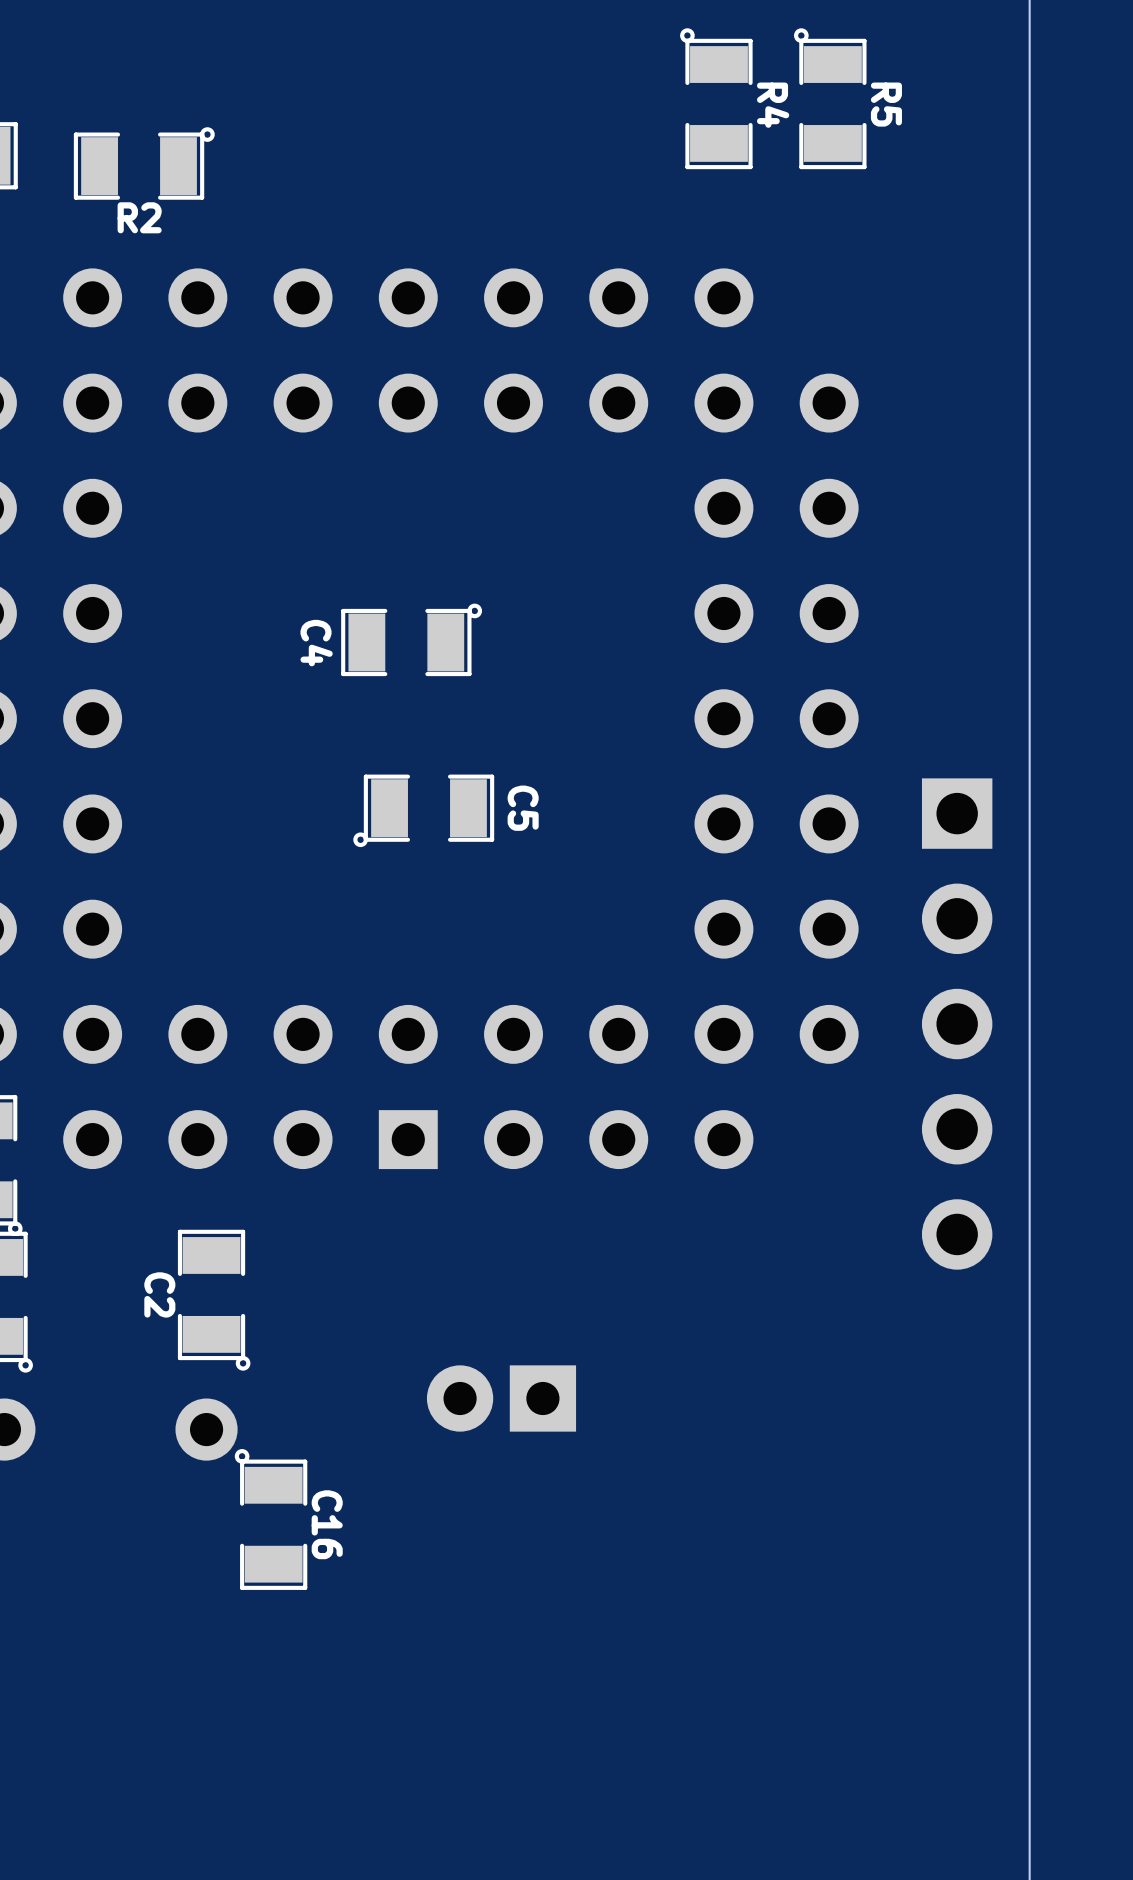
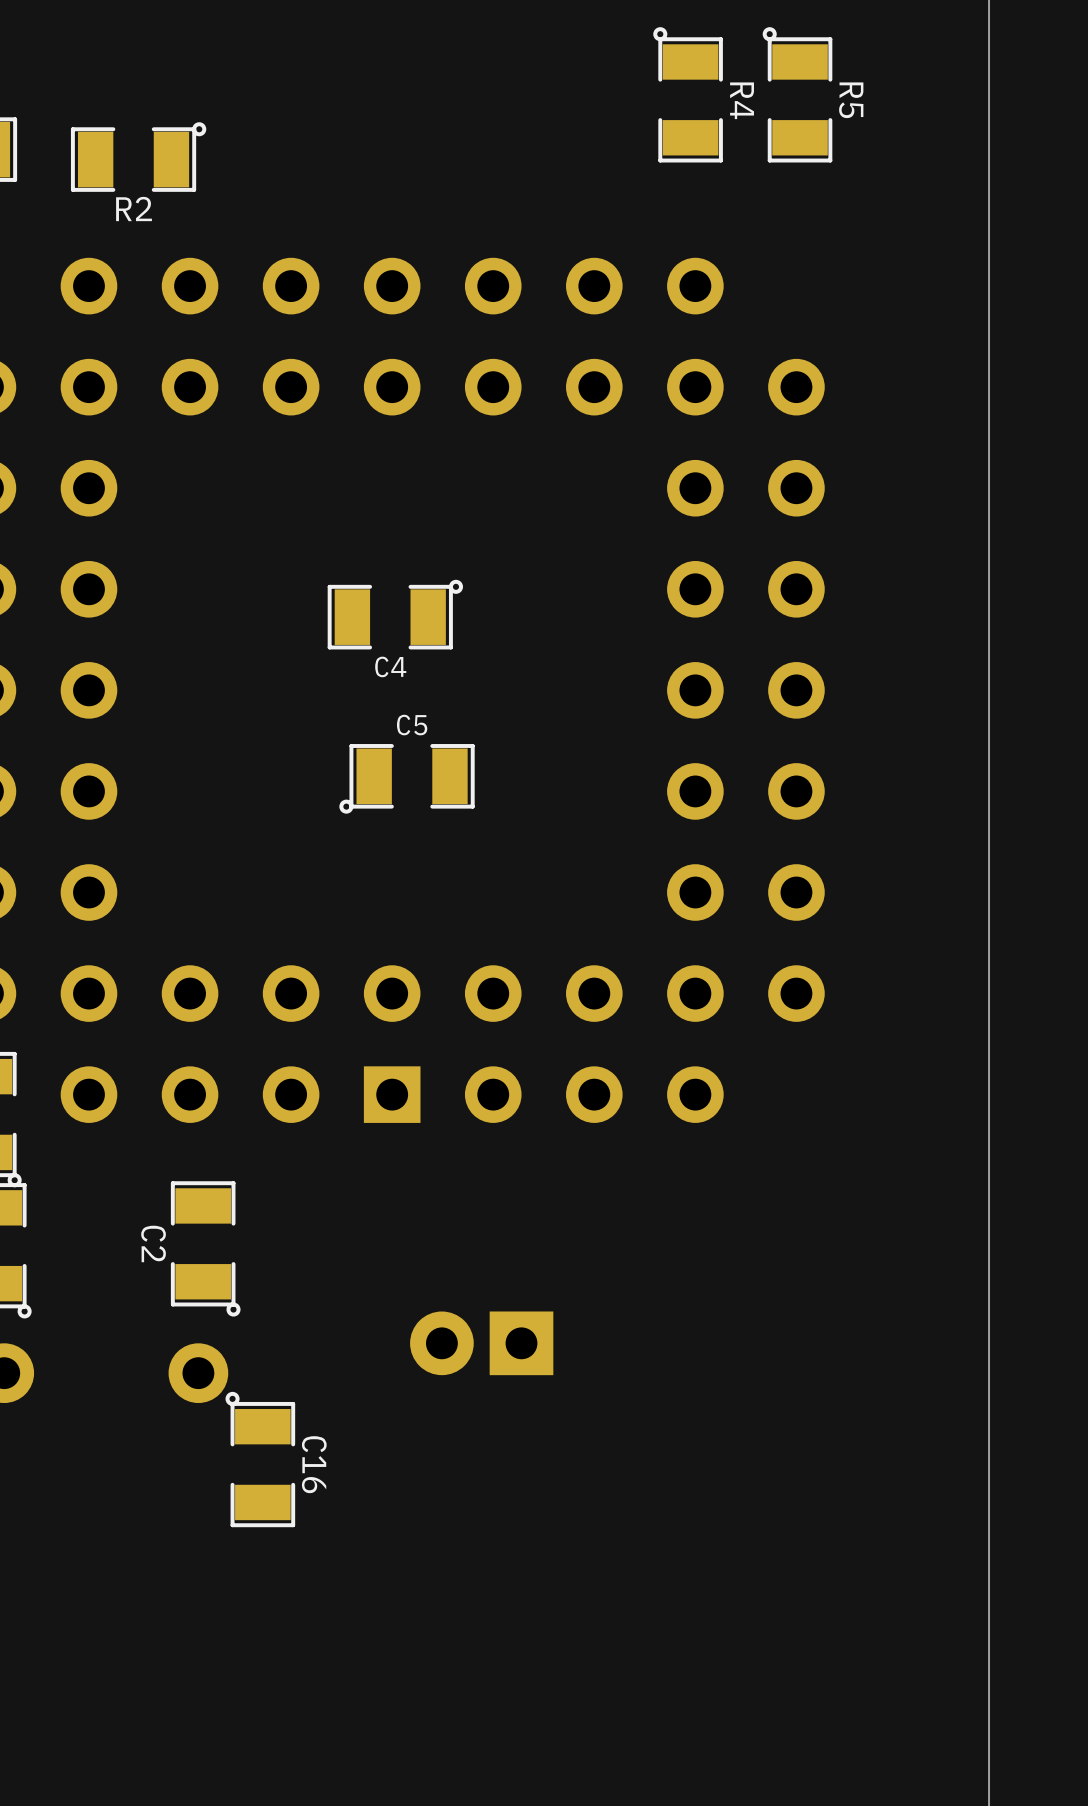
C4 name rotation: 0° (316, 643) -> 90° counterclockwise (390, 666)
C4 name position: C4 (316, 643) -> C4 (390, 666)
C5 name rotation: 0° (523, 808) -> 90° counterclockwise (412, 725)
C5 name position: C5 (523, 808) -> C5 (412, 725)
part: (957, 1024) -> none

